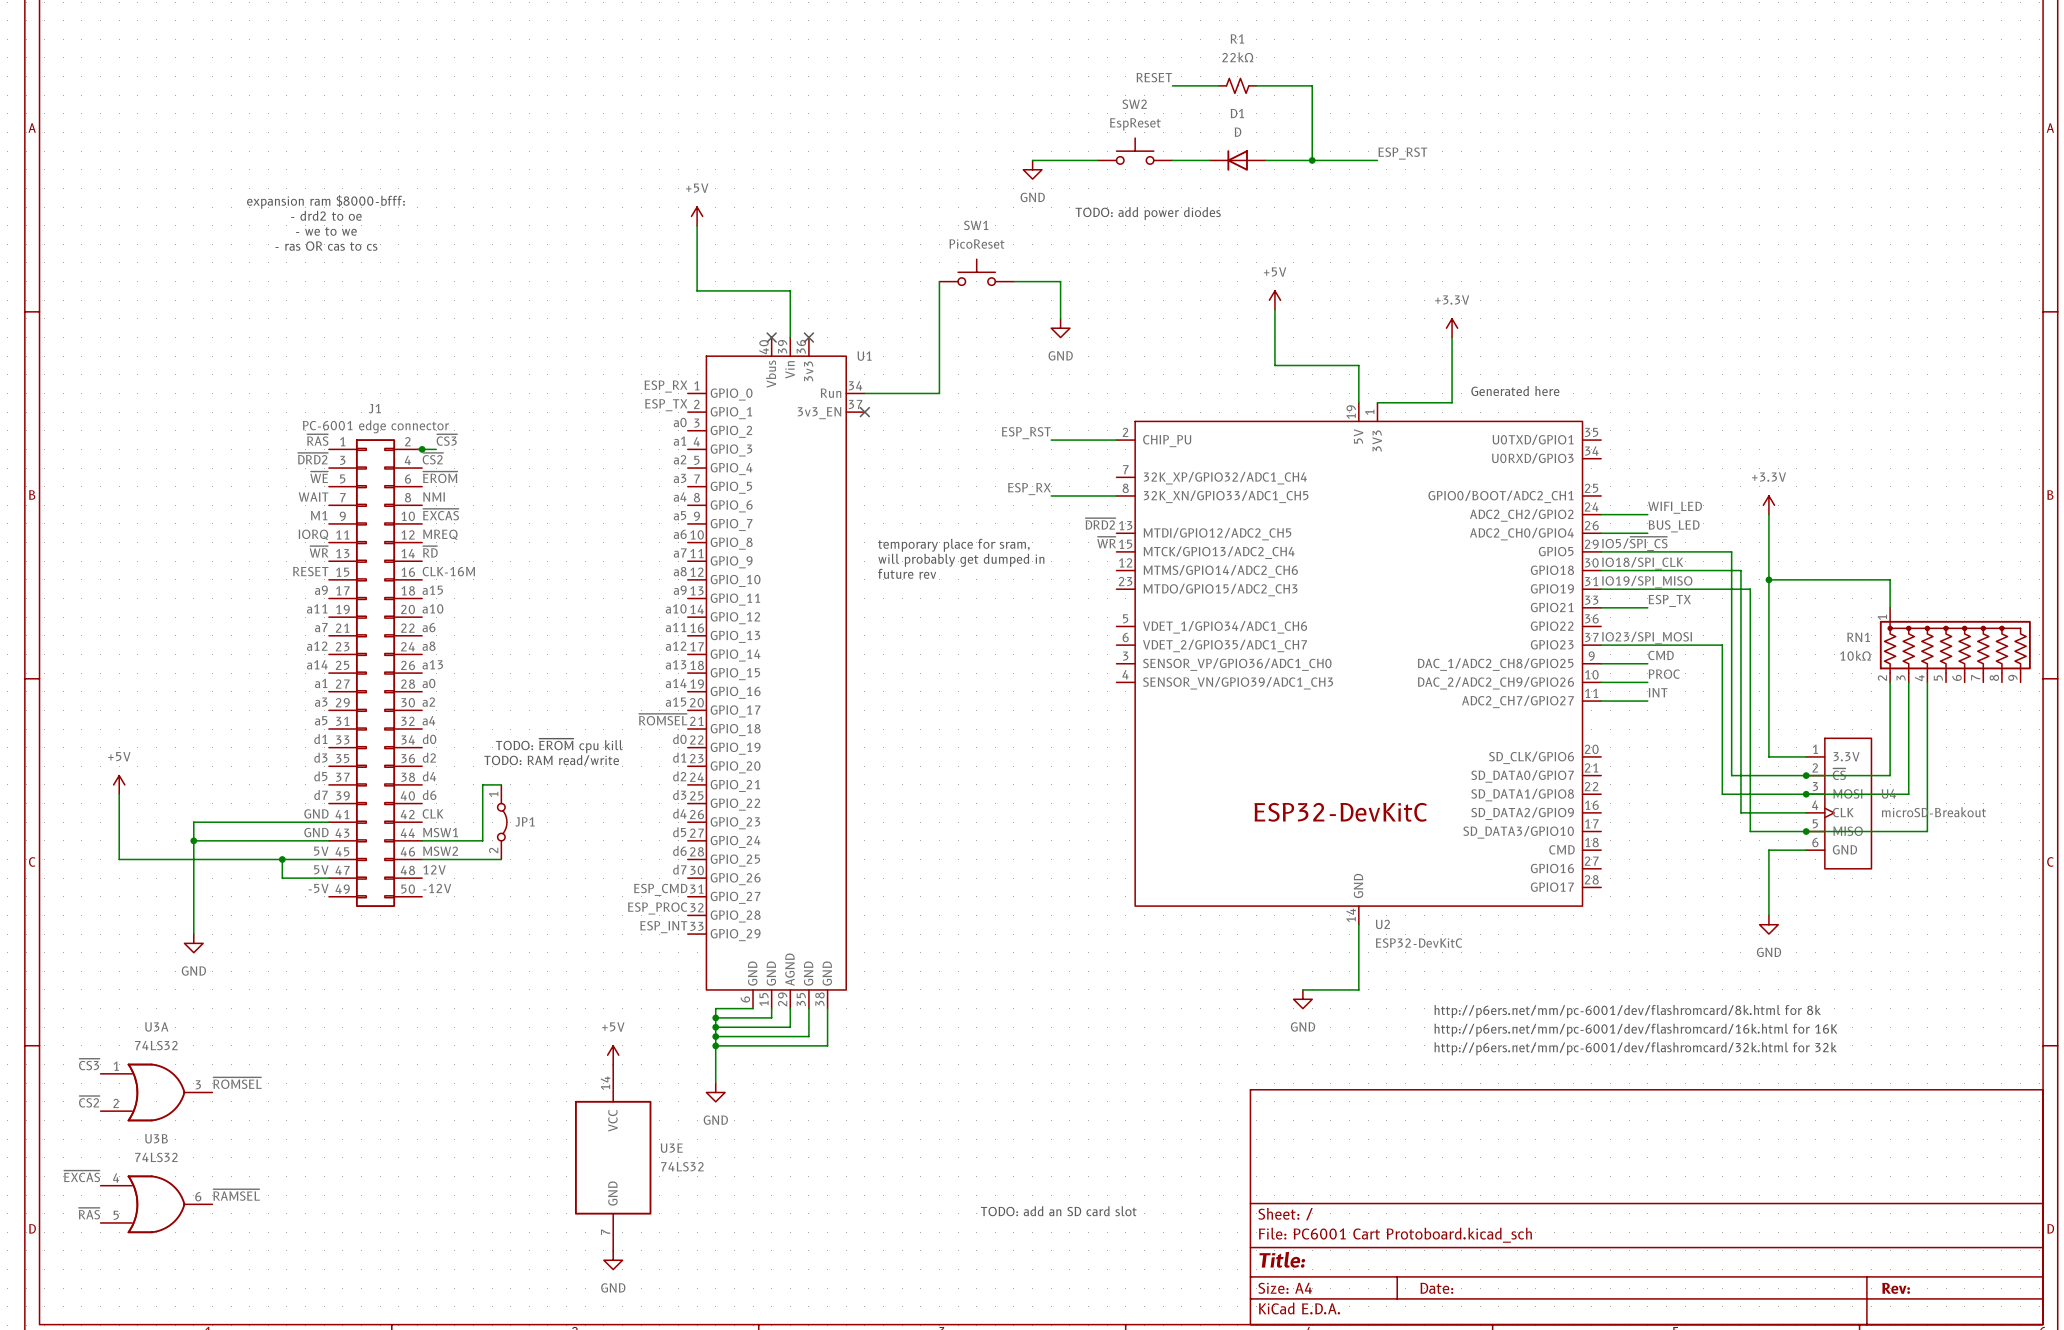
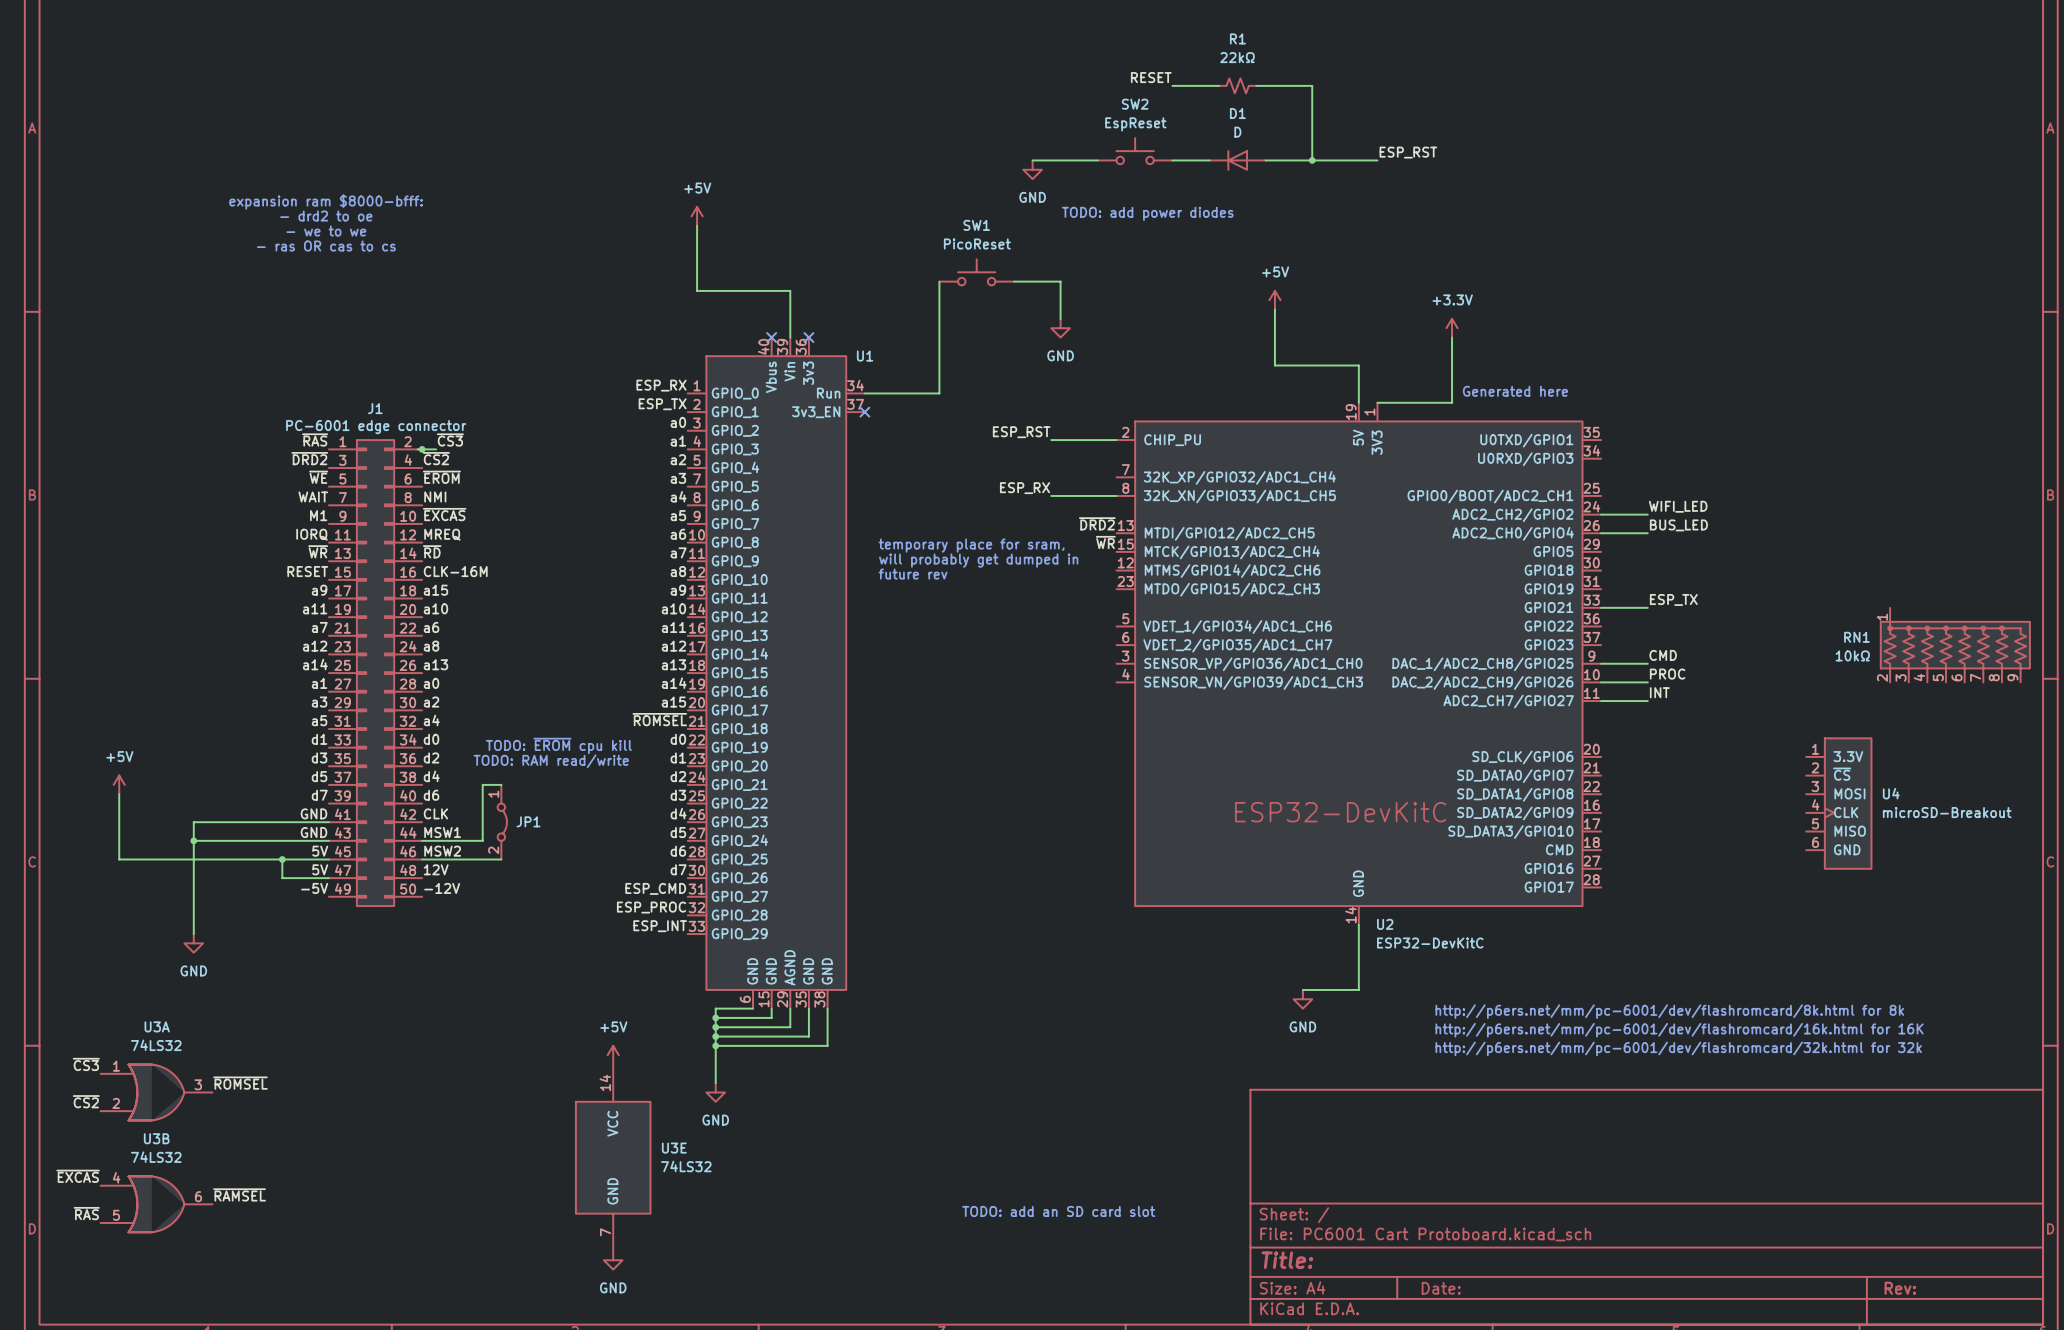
power symbol: +3.3V (1768, 505) -> none
wire: (1768, 514) (1768, 756) (1806, 756) -> none
label: IO5/~{SPI_CS} (1634, 543) -> none
wire: (1601, 551) (1731, 551) (1731, 775) (1890, 775) (1890, 682) -> none
label: IO18/SPI_CLK (1642, 563) -> none
wire: (1601, 570) (1740, 570) (1740, 812) (1806, 812) -> none
wire: (1768, 579) (1890, 579) (1890, 607) -> none
junction: (1768, 579) -> none
label: IO19/SPI_MISO (1647, 582) -> none
wire: (1601, 589) (1750, 589) (1750, 831) (1927, 831) (1927, 682) -> none
label: IO23/SPI_MOSI (1647, 637) -> none
wire: (1601, 645) (1722, 645) (1722, 794) (1908, 794) (1908, 682) -> none
junction: (1806, 775) -> none
junction: (1806, 794) -> none
junction: (1806, 831) -> none
wire: (1806, 850) (1768, 850) (1768, 915) -> none
power symbol: GND (1768, 924) -> none

